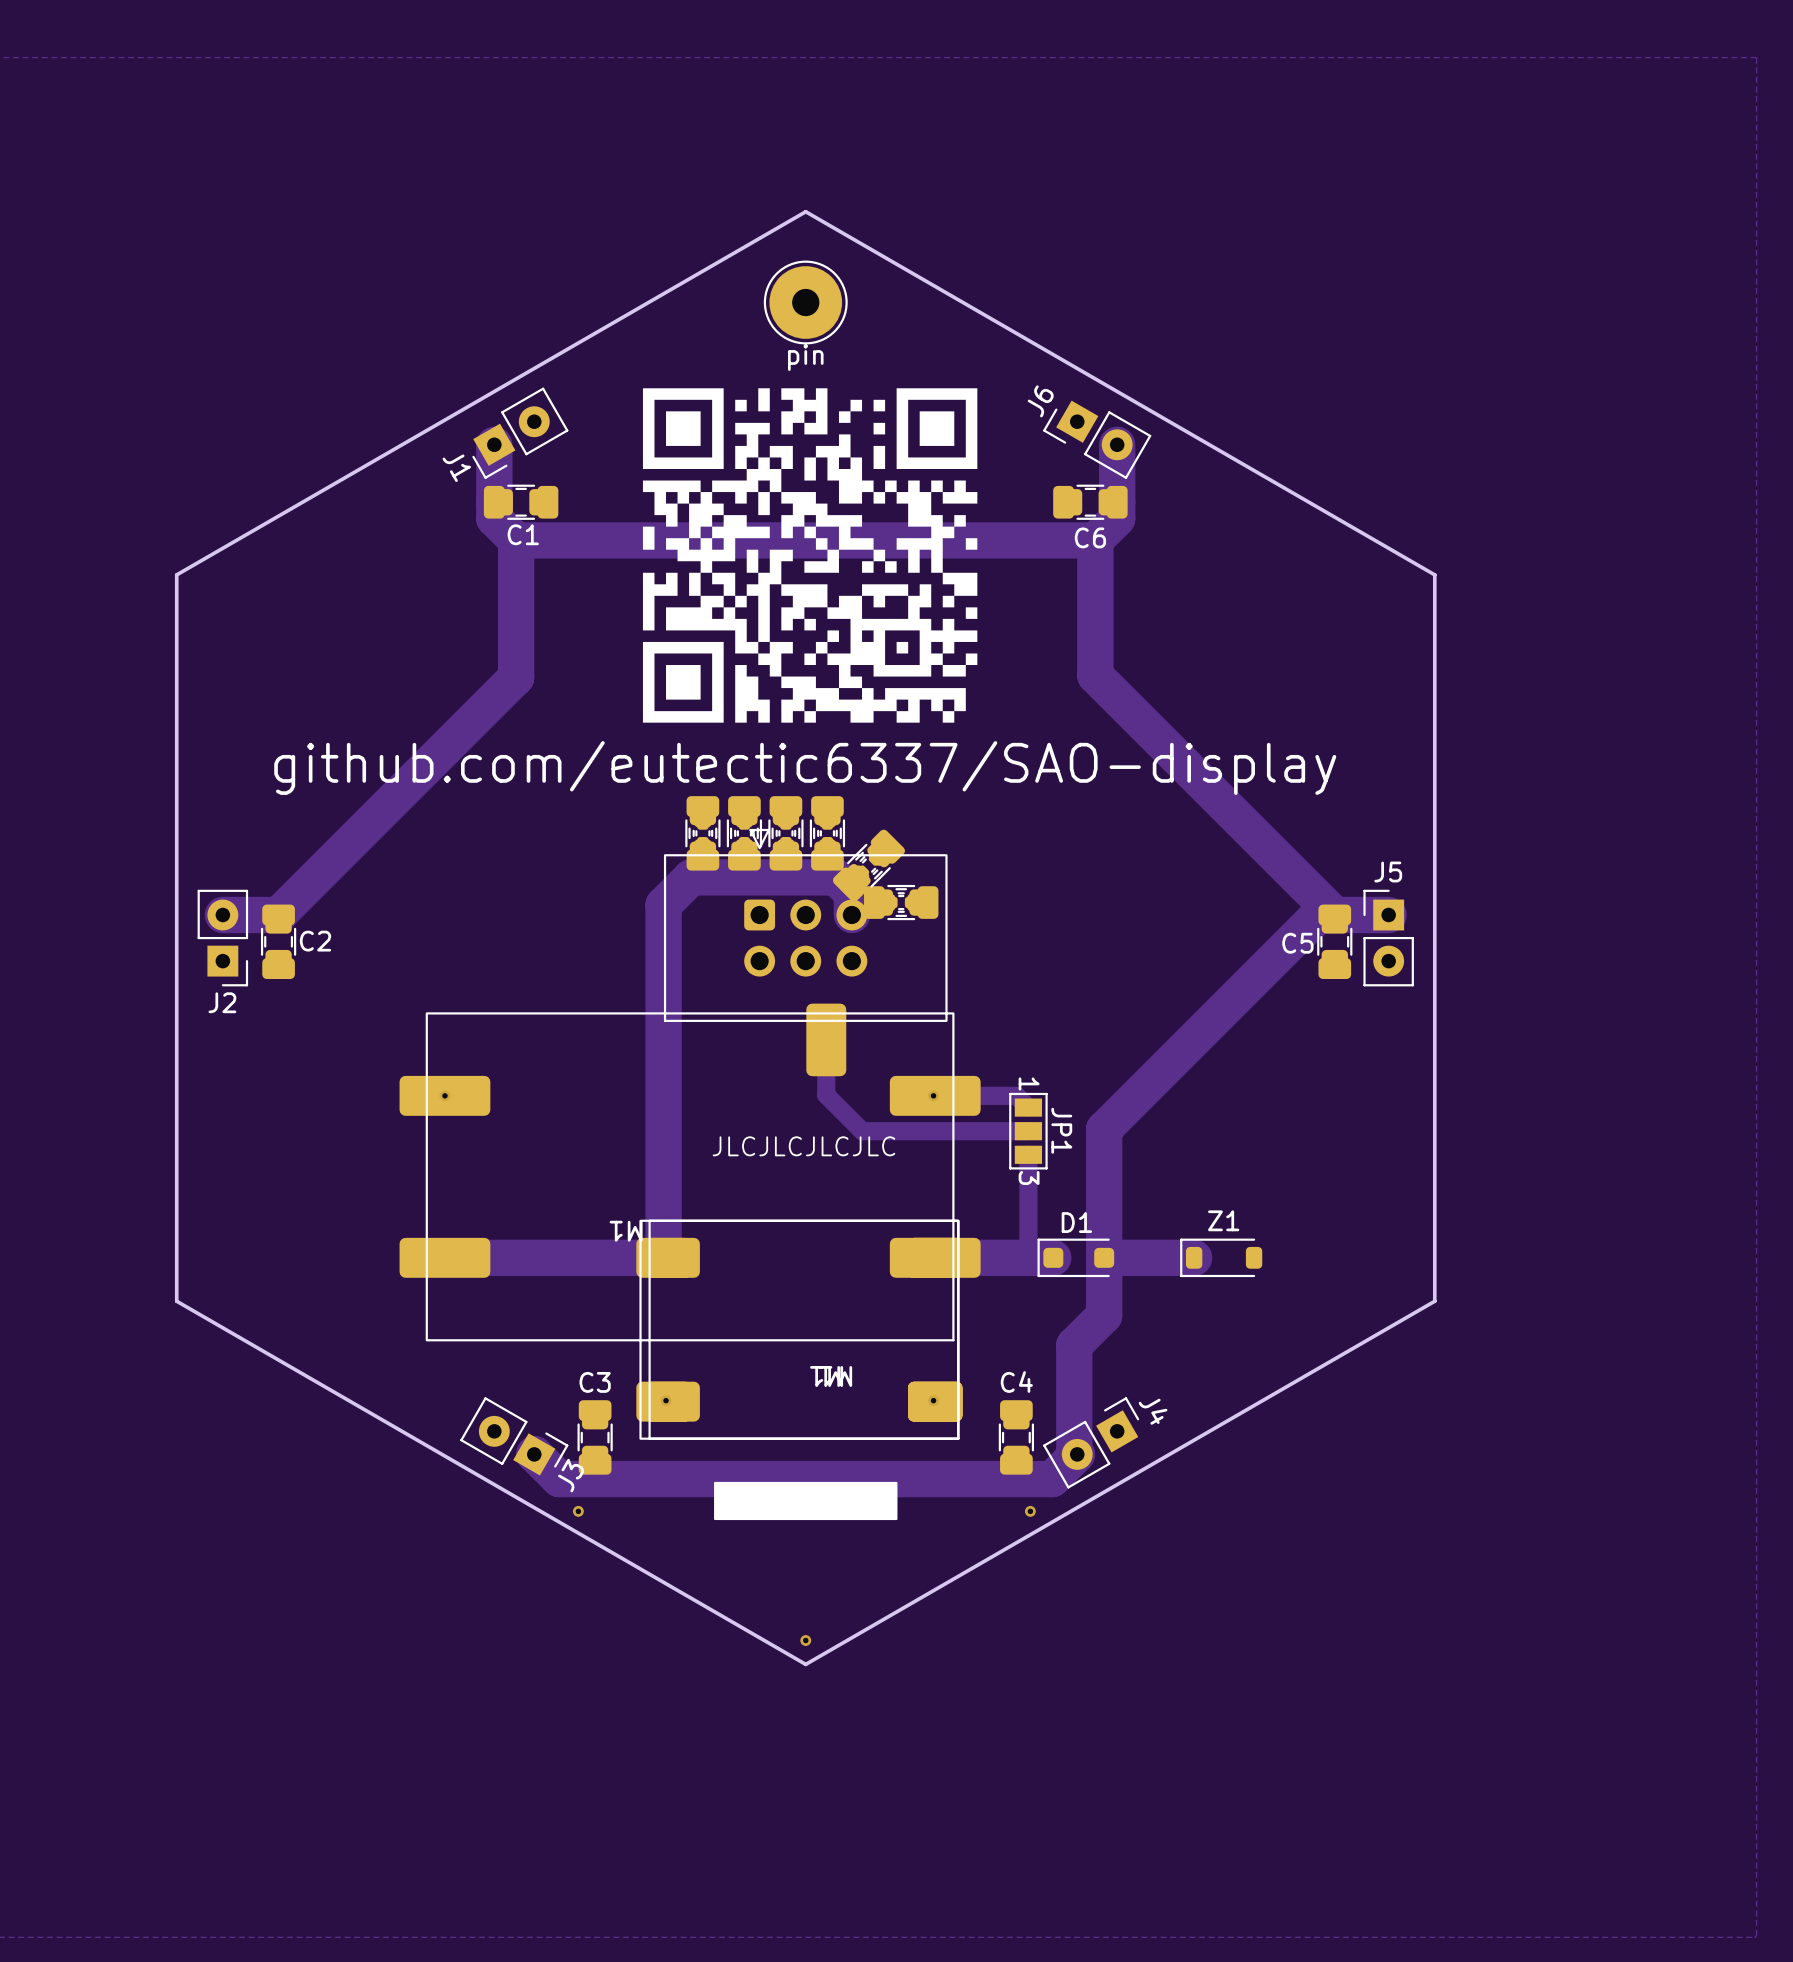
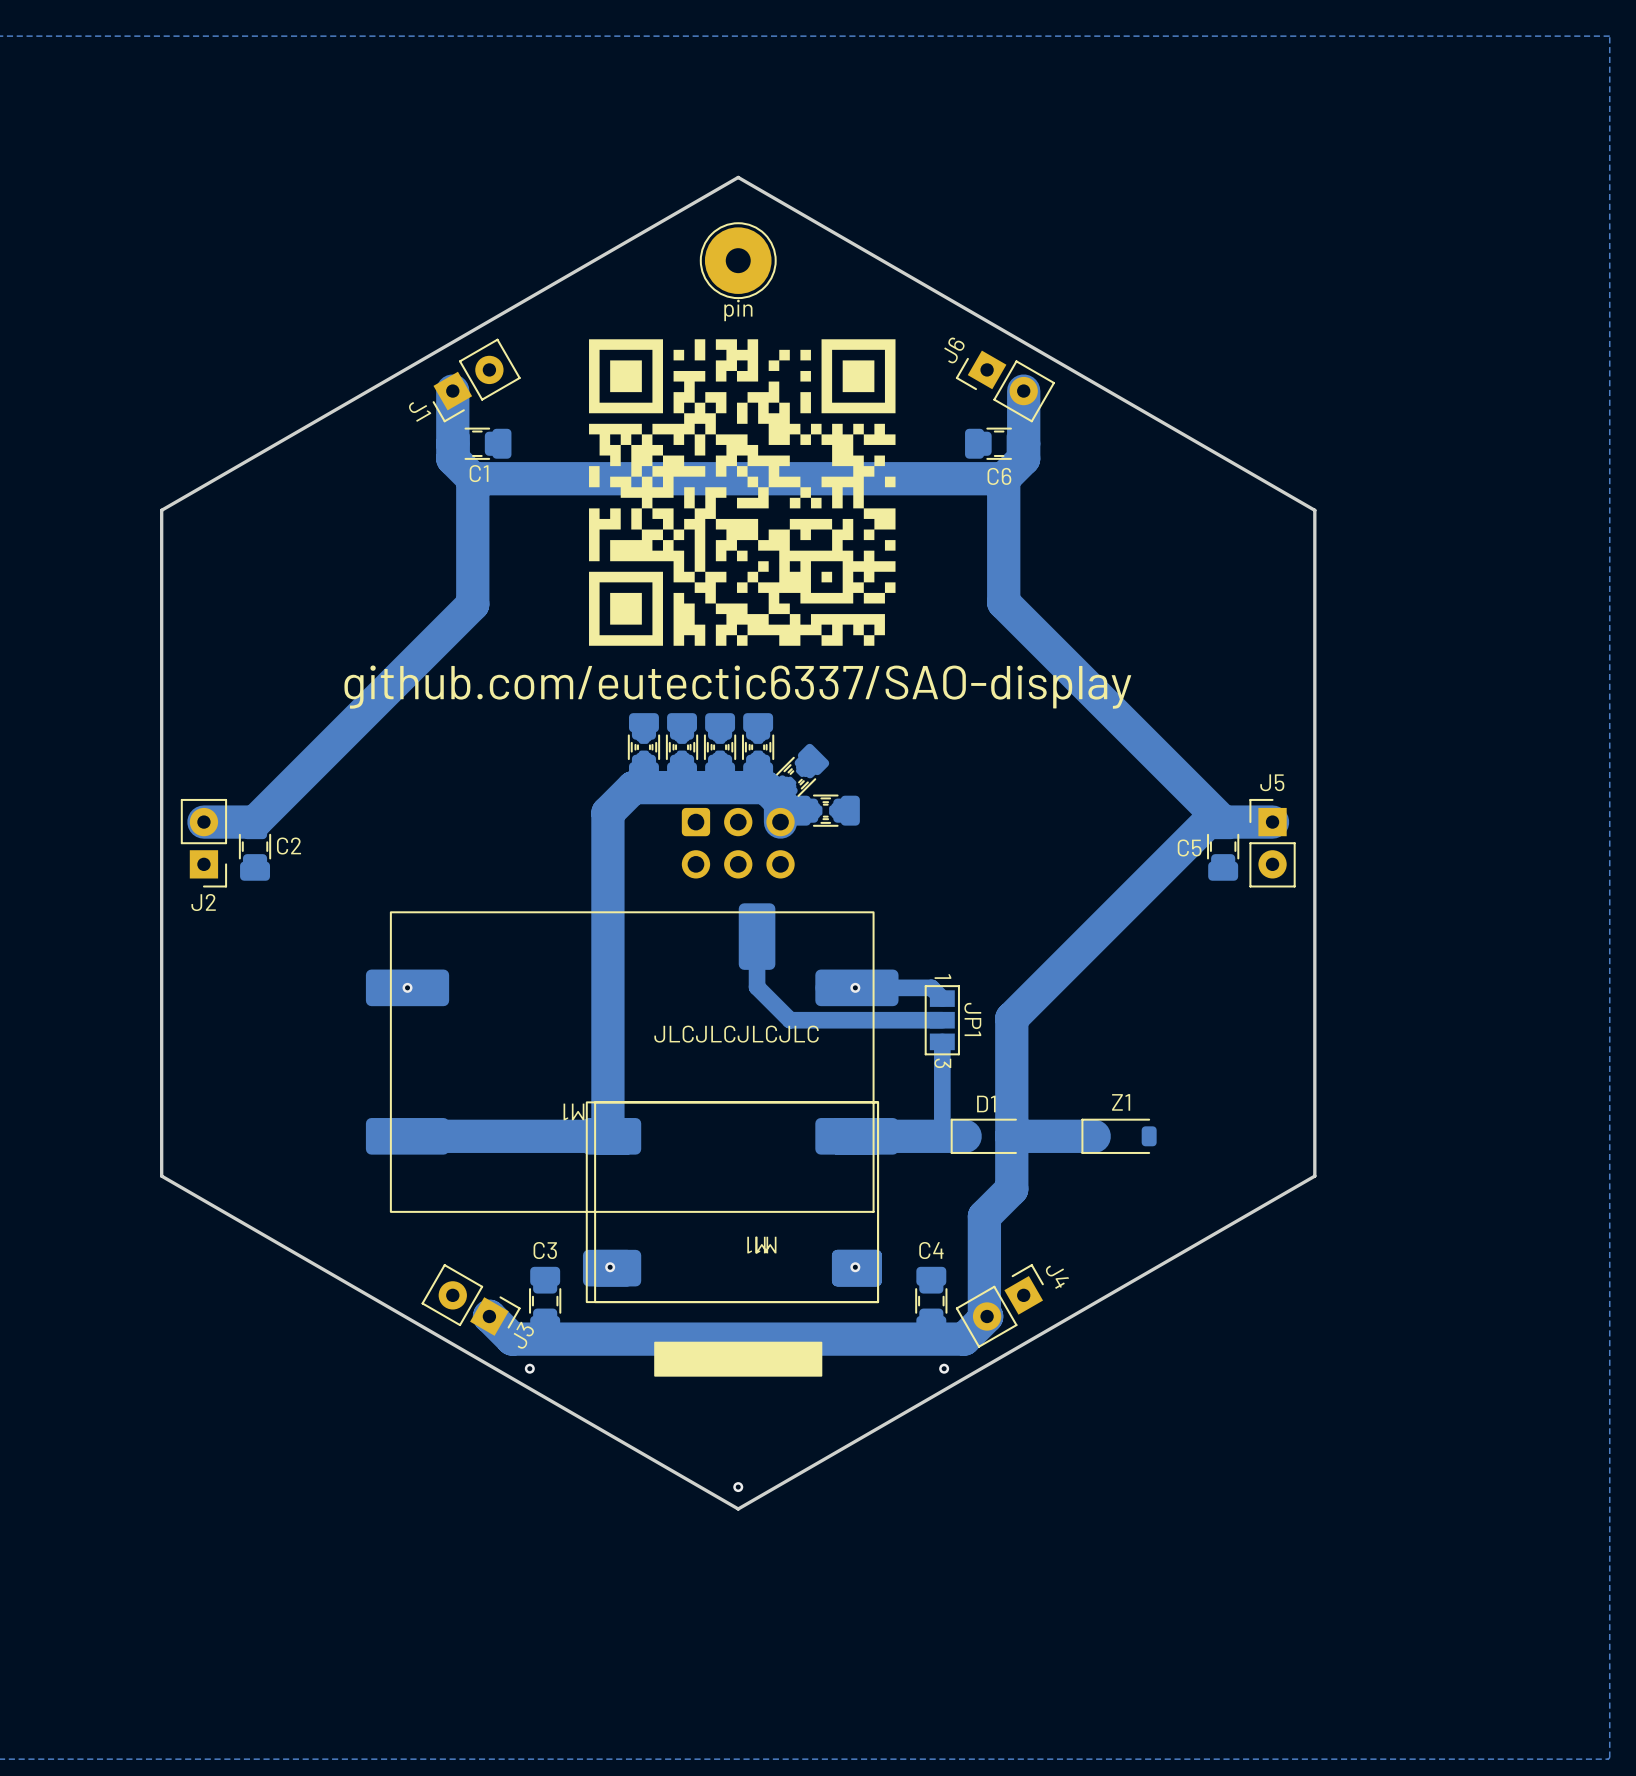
part footprint: [663, 828, 948, 1022] -> [681, 807, 795, 879]

